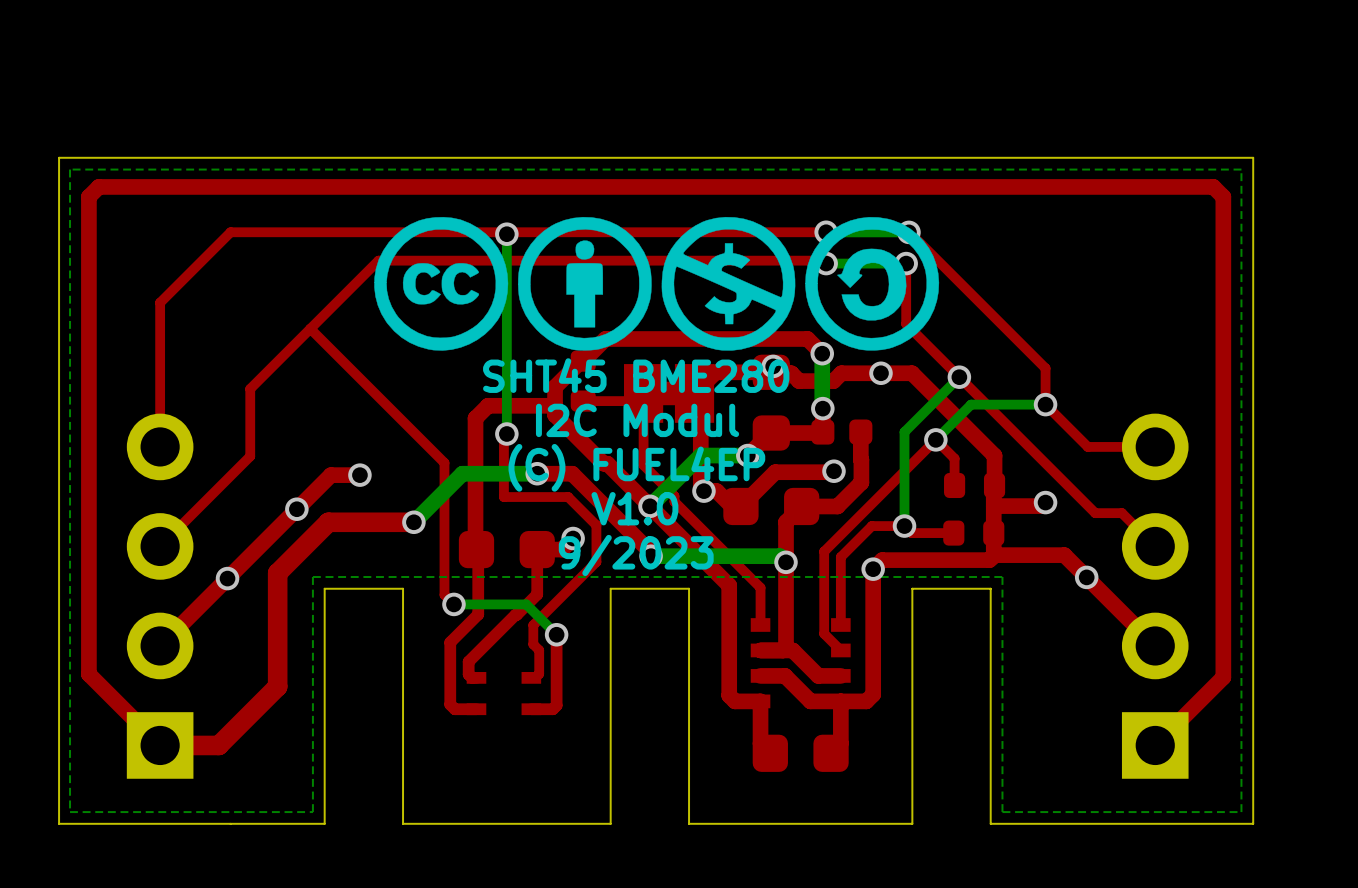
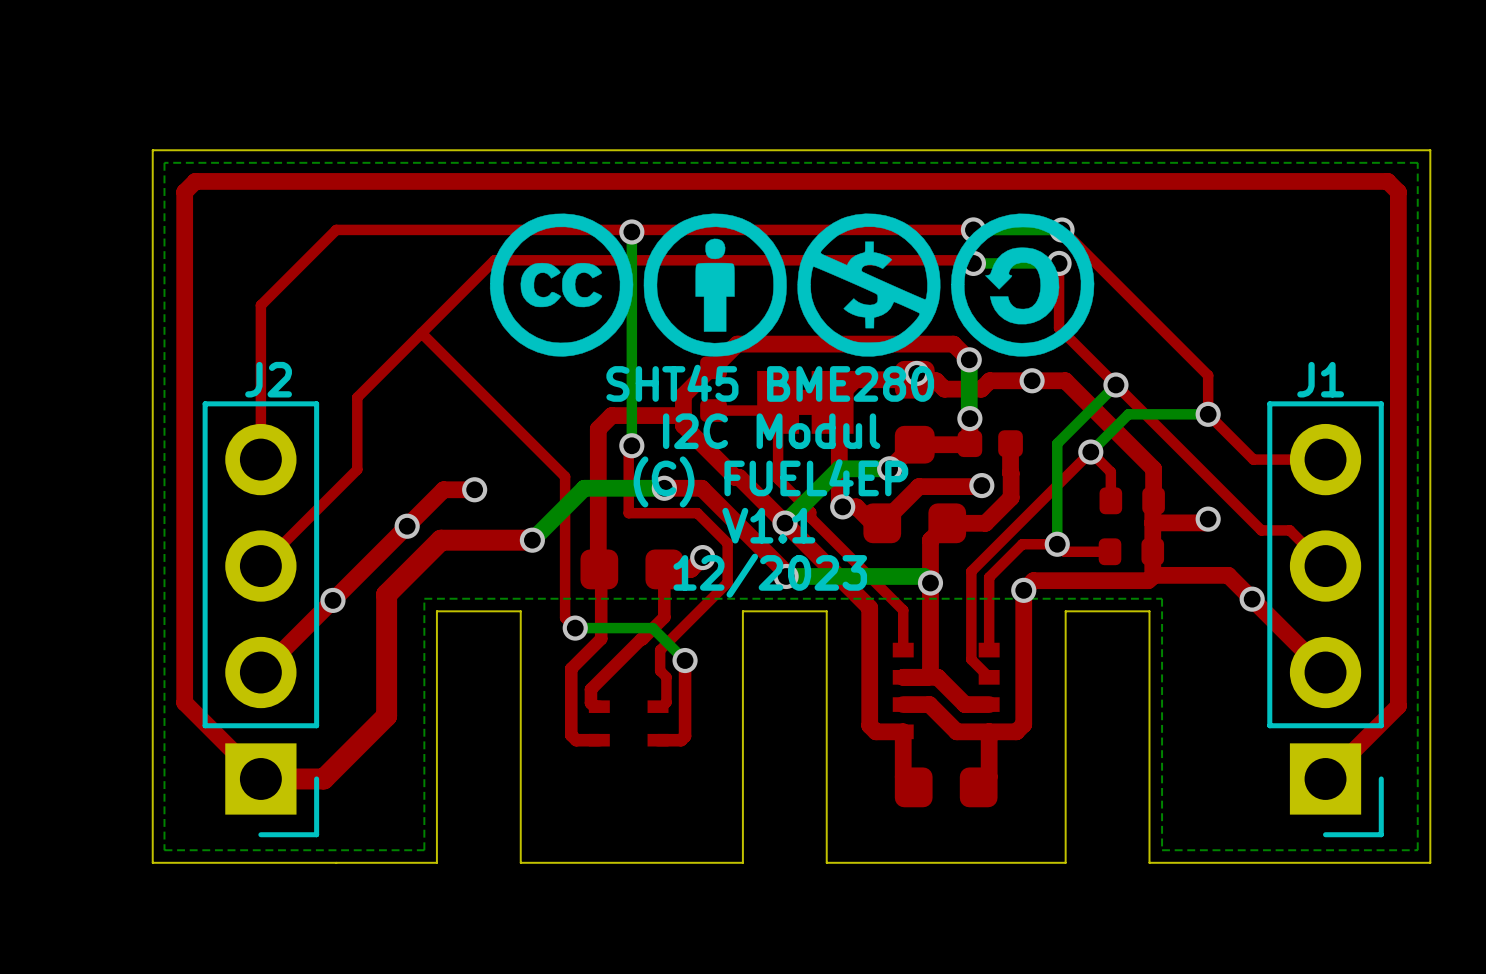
text: V1.0 (634, 508) -> V1.1 (768, 525)
text: 9/2023 (636, 555) -> 12/2023 (770, 575)
J2 side: top (160, 596) -> bottom (260, 619)
J1 side: top (1155, 596) -> bottom (1325, 619)

